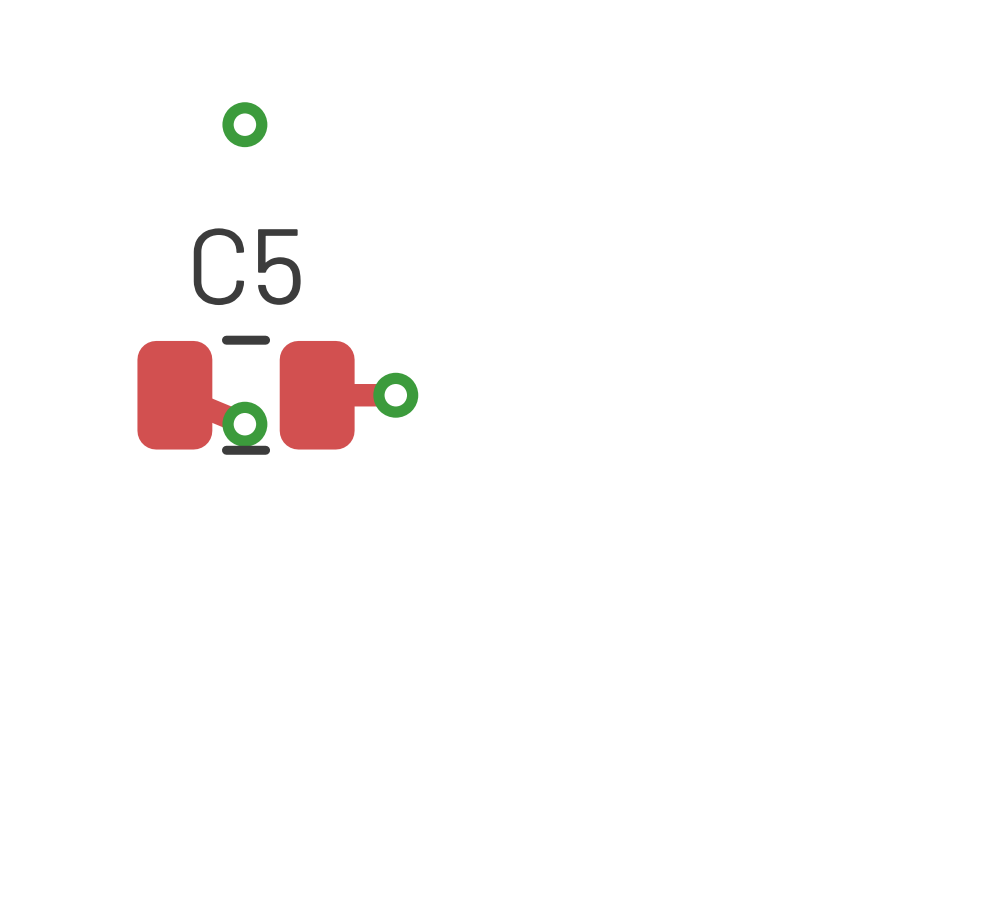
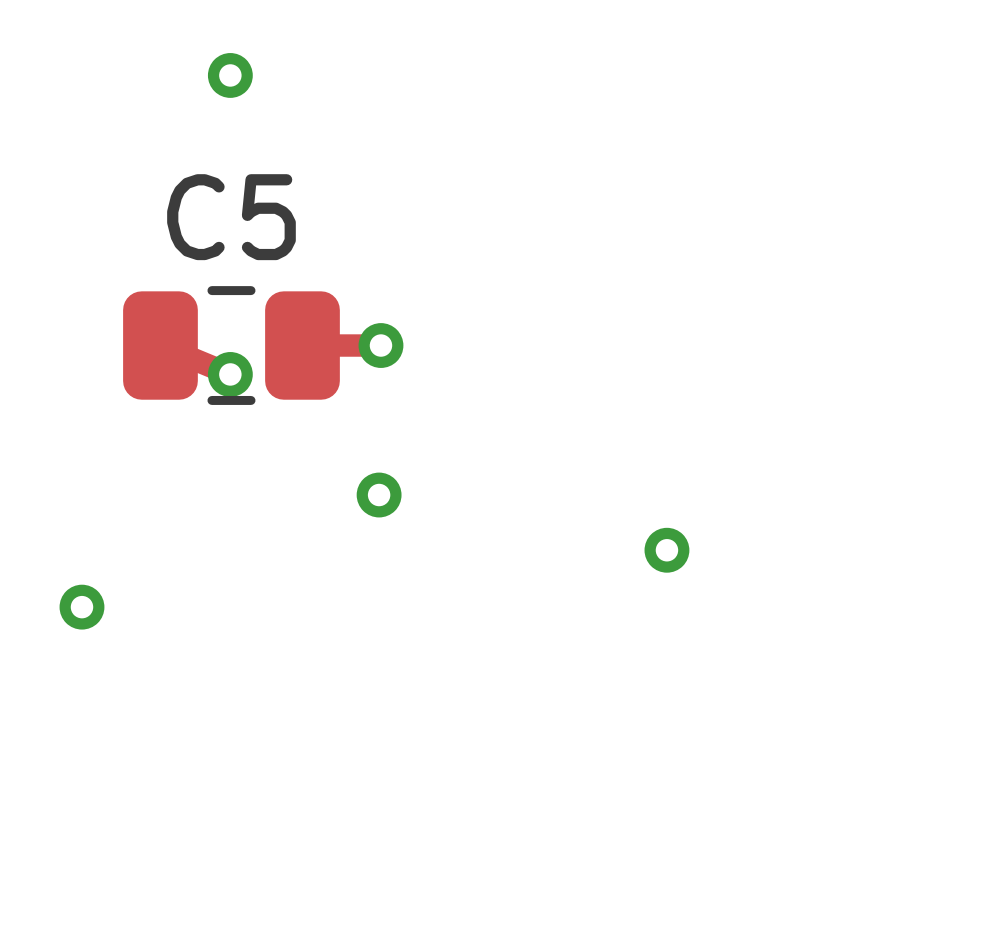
via: none -> (379, 495)
via: none -> (666, 550)
via: none -> (81, 607)

